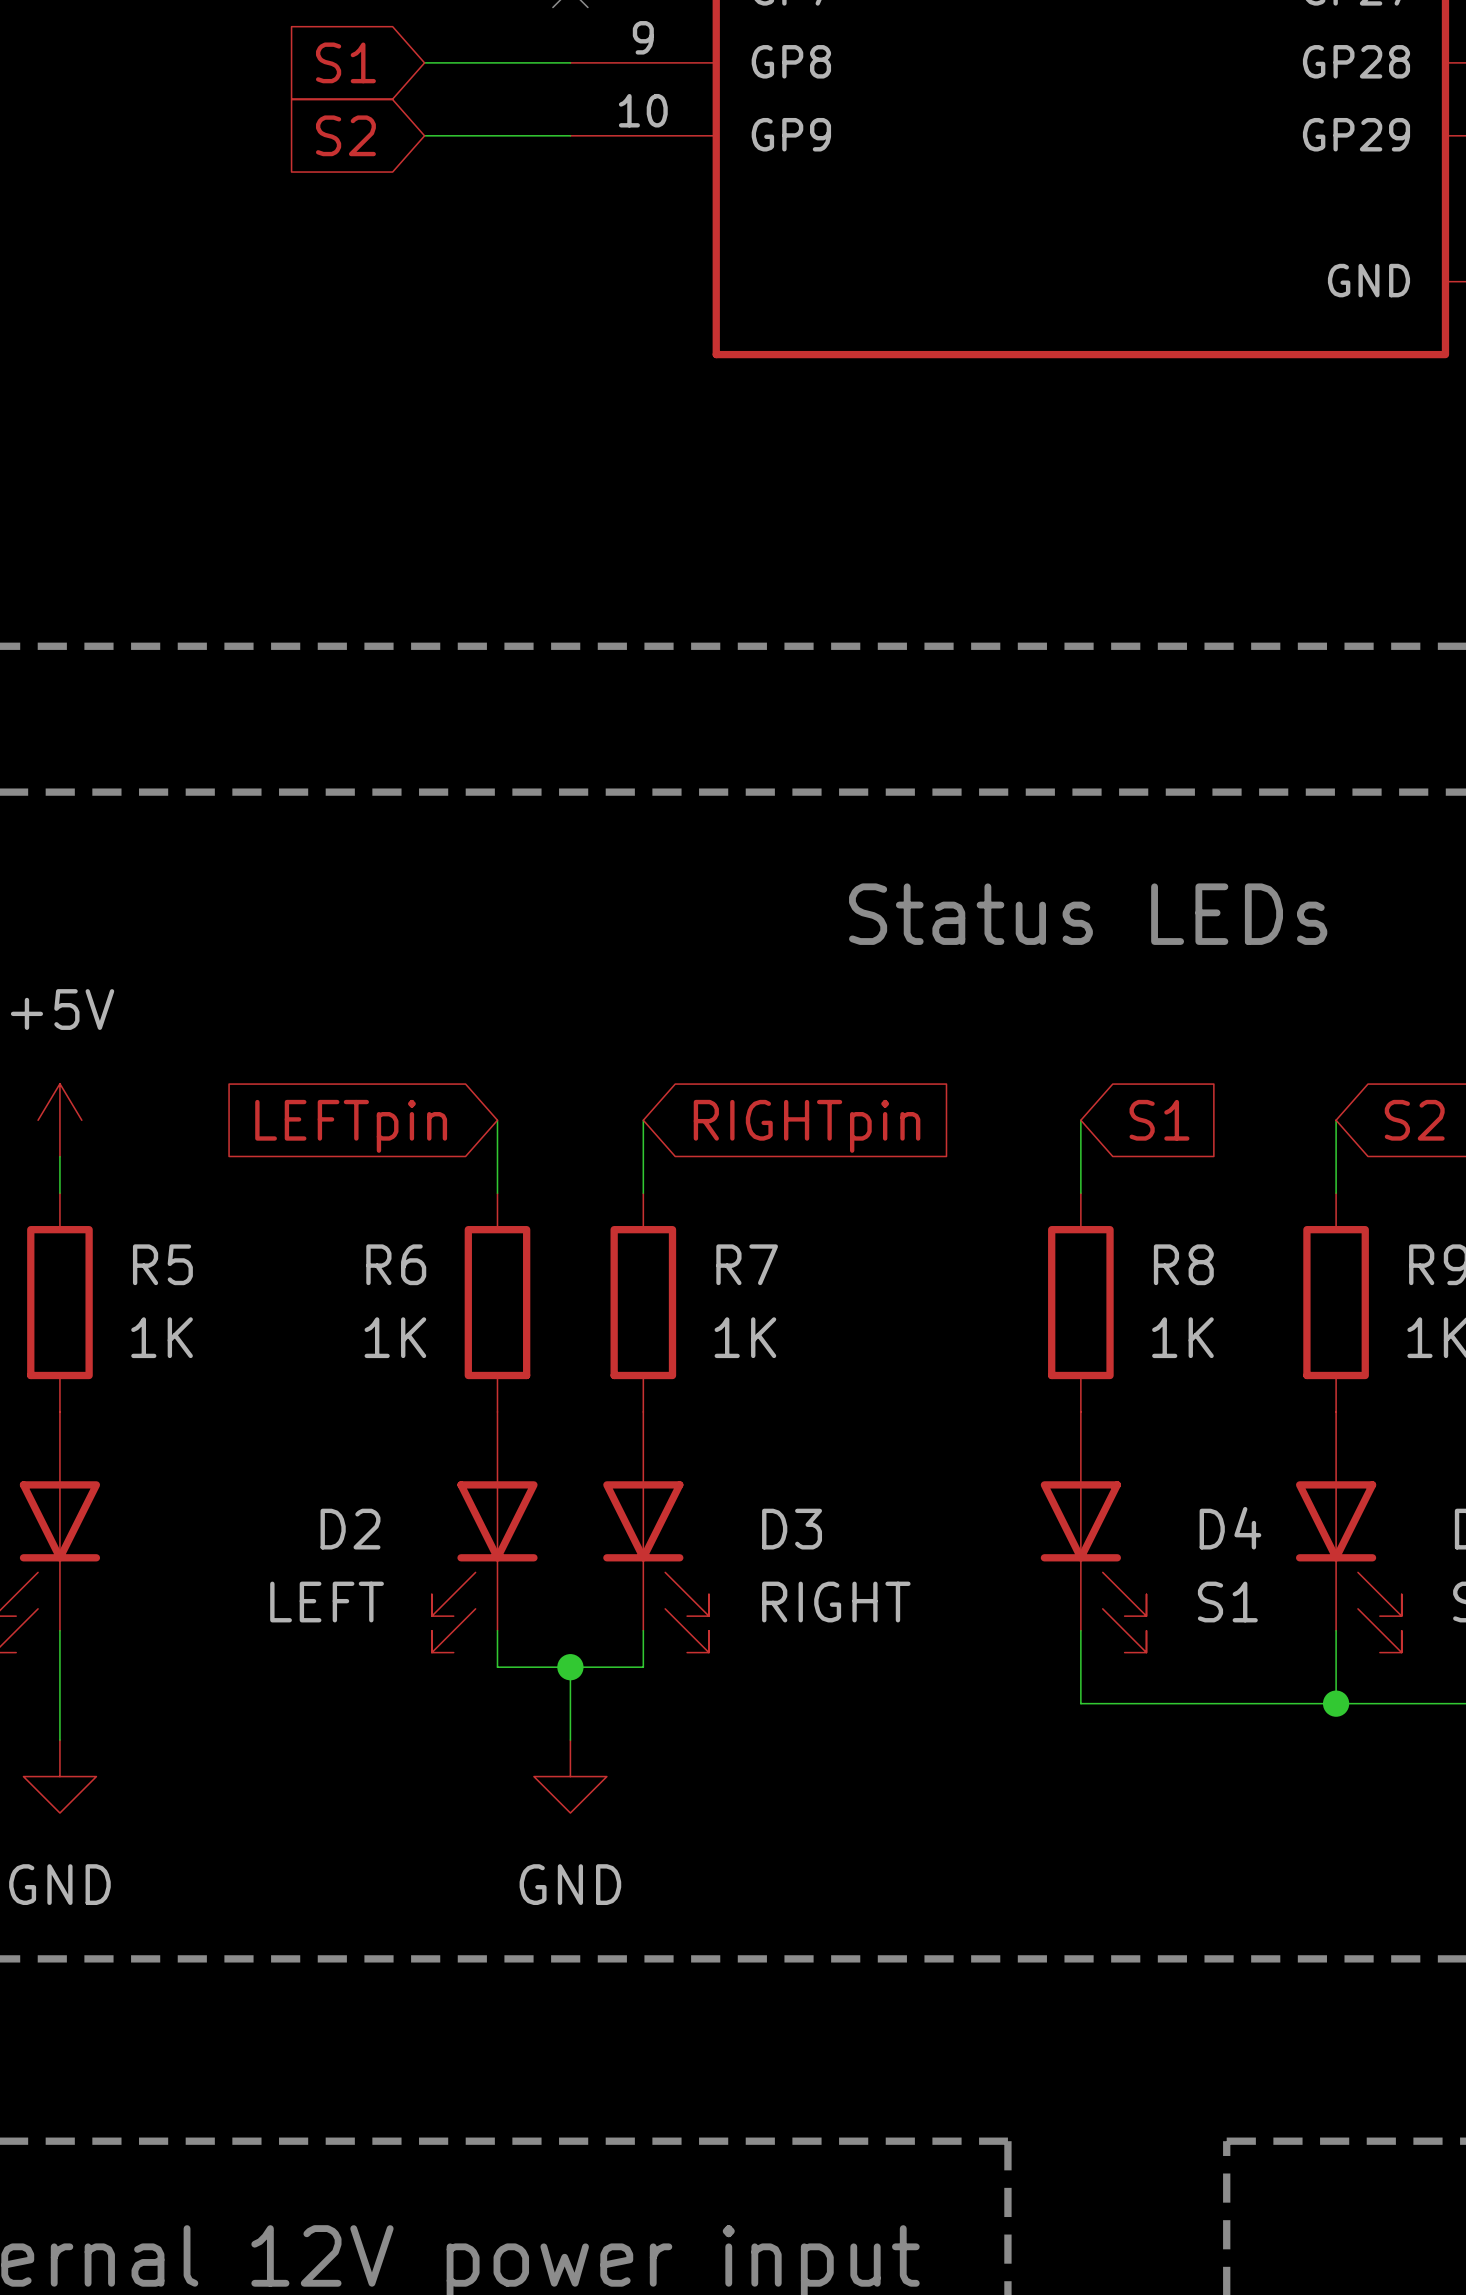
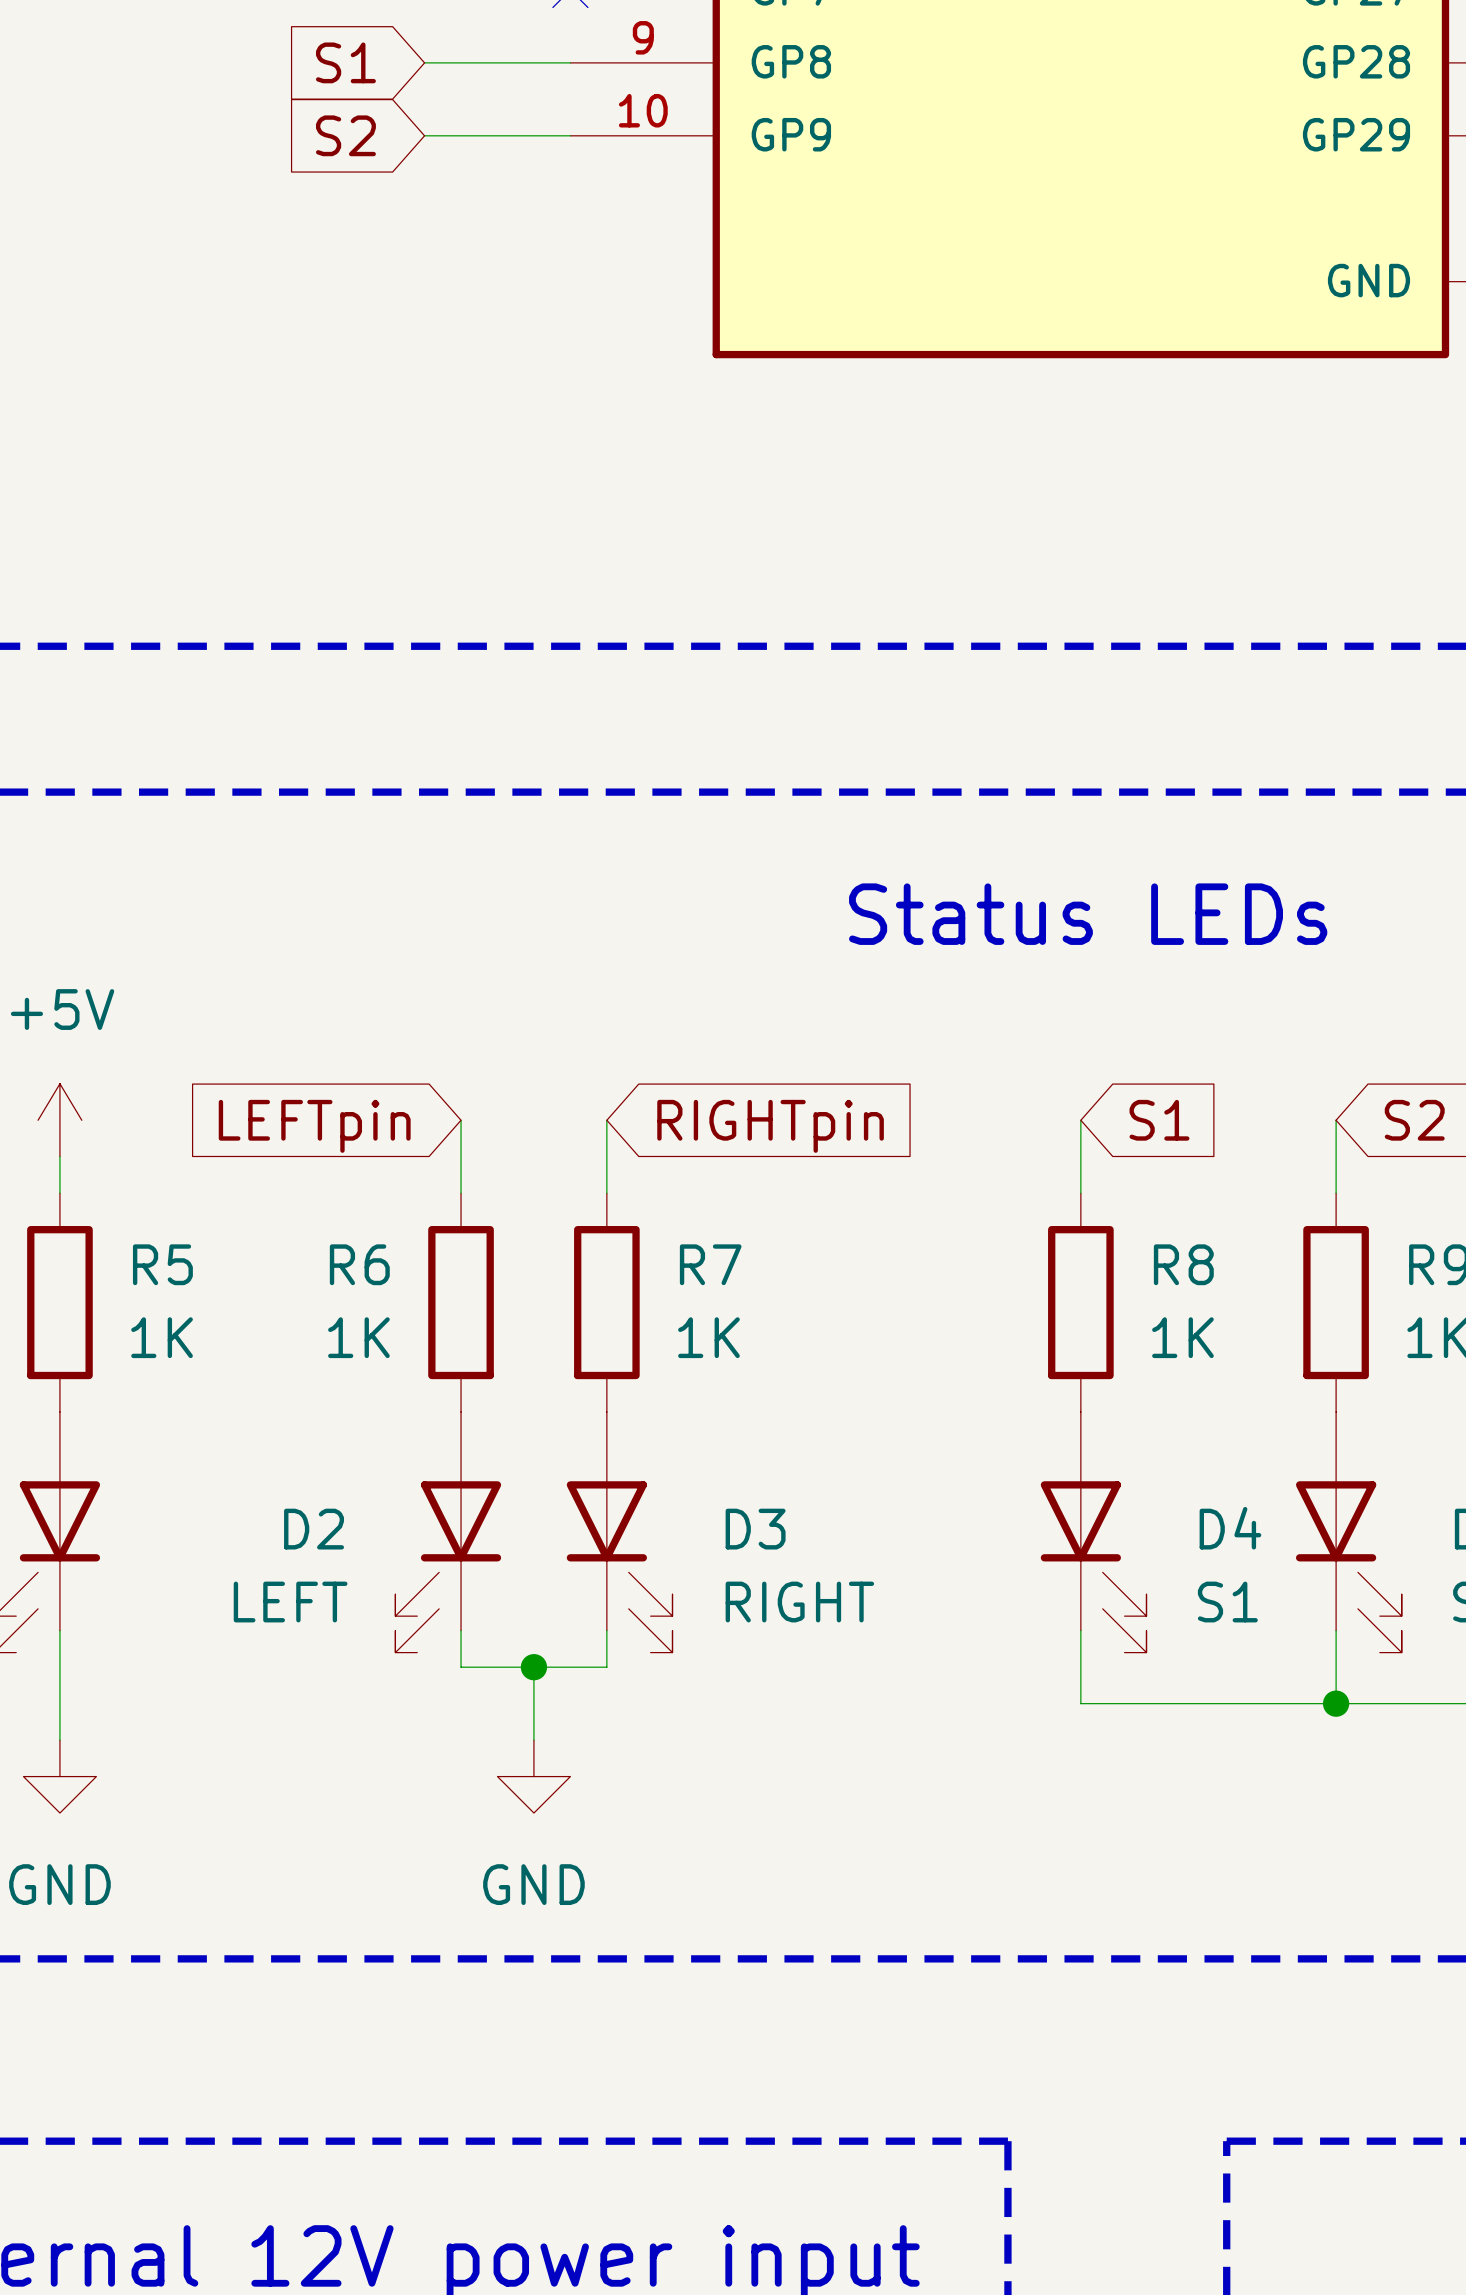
wire: (497, 1120) (497, 1193) -> (461, 1120) (461, 1193)
wire: (643, 1120) (643, 1193) -> (606, 1120) (606, 1193)
global label position: LEFTpin (351, 1126) -> LEFTpin (314, 1126)
global label position: RIGHTpin (807, 1126) -> RIGHTpin (770, 1126)
R6 position: (497, 1302) -> (461, 1302)
R7 position: (643, 1302) -> (606, 1302)
D2 position: (484, 1532) -> (448, 1532)
D3 position: (656, 1532) -> (619, 1532)
wire: (497, 1630) (497, 1667) -> (461, 1630) (461, 1667) (497, 1667)
wire: (643, 1630) (643, 1667) (606, 1667) -> (606, 1630) (606, 1667)
wire: (570, 1667) (570, 1740) -> (533, 1667) (533, 1740)
junction position: (570, 1667) -> (533, 1667)
power symbol position: GND (570, 1776) -> GND (533, 1776)

